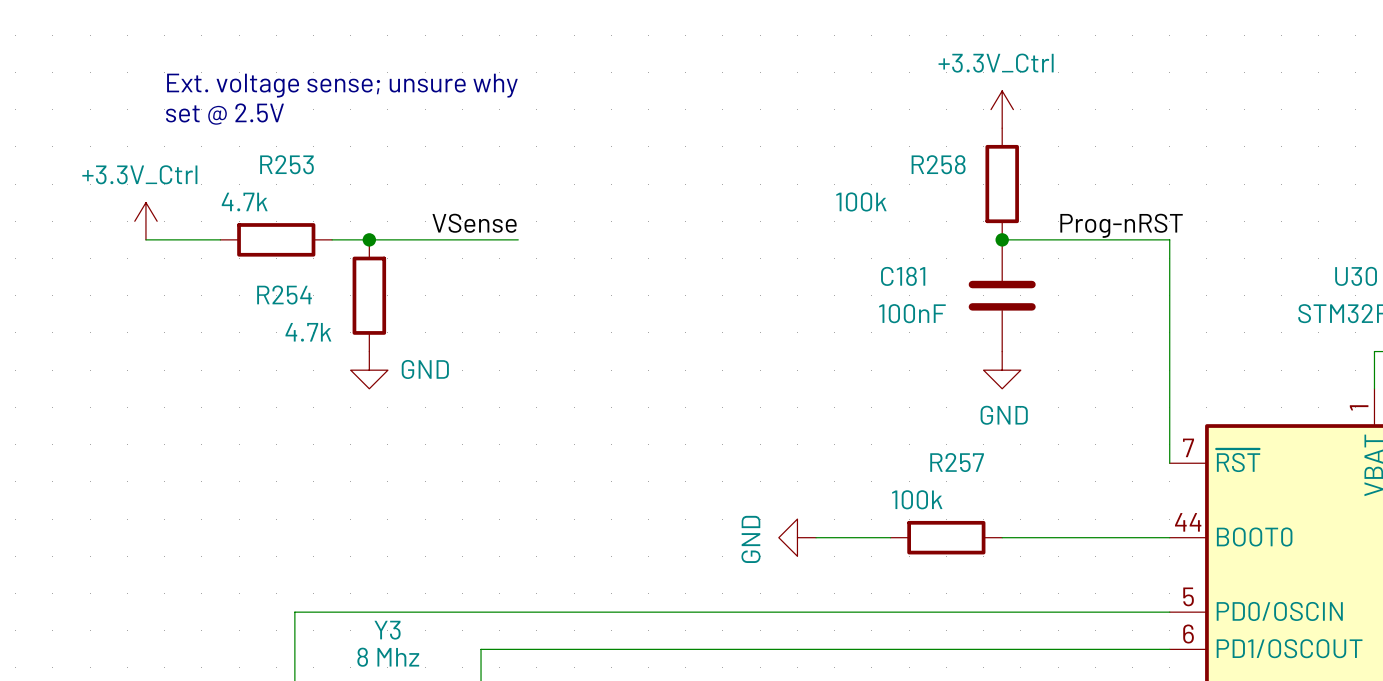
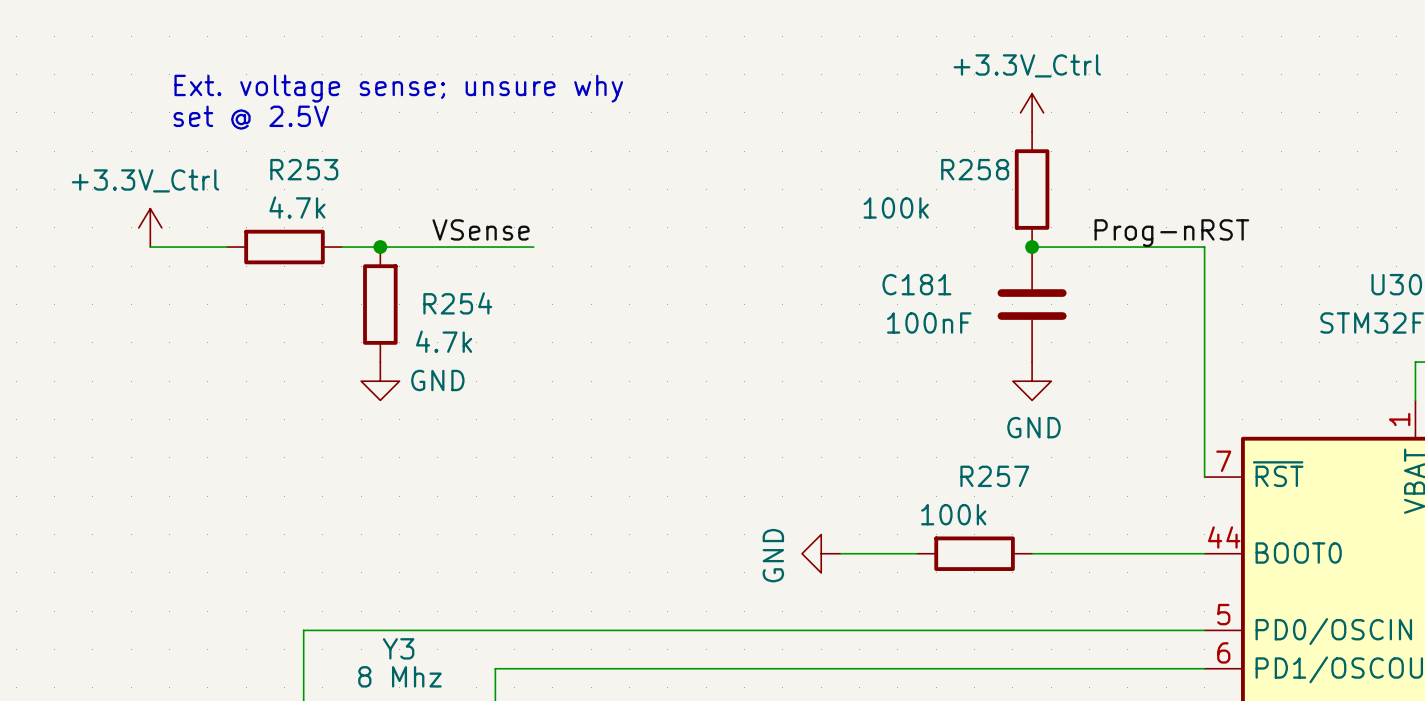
R253 value position: 4.7k (244, 201) -> 4.7k (297, 207)
R254 name position: R254 (284, 295) -> R254 (457, 303)
R254 value position: 4.7k (308, 332) -> 4.7k (444, 341)

